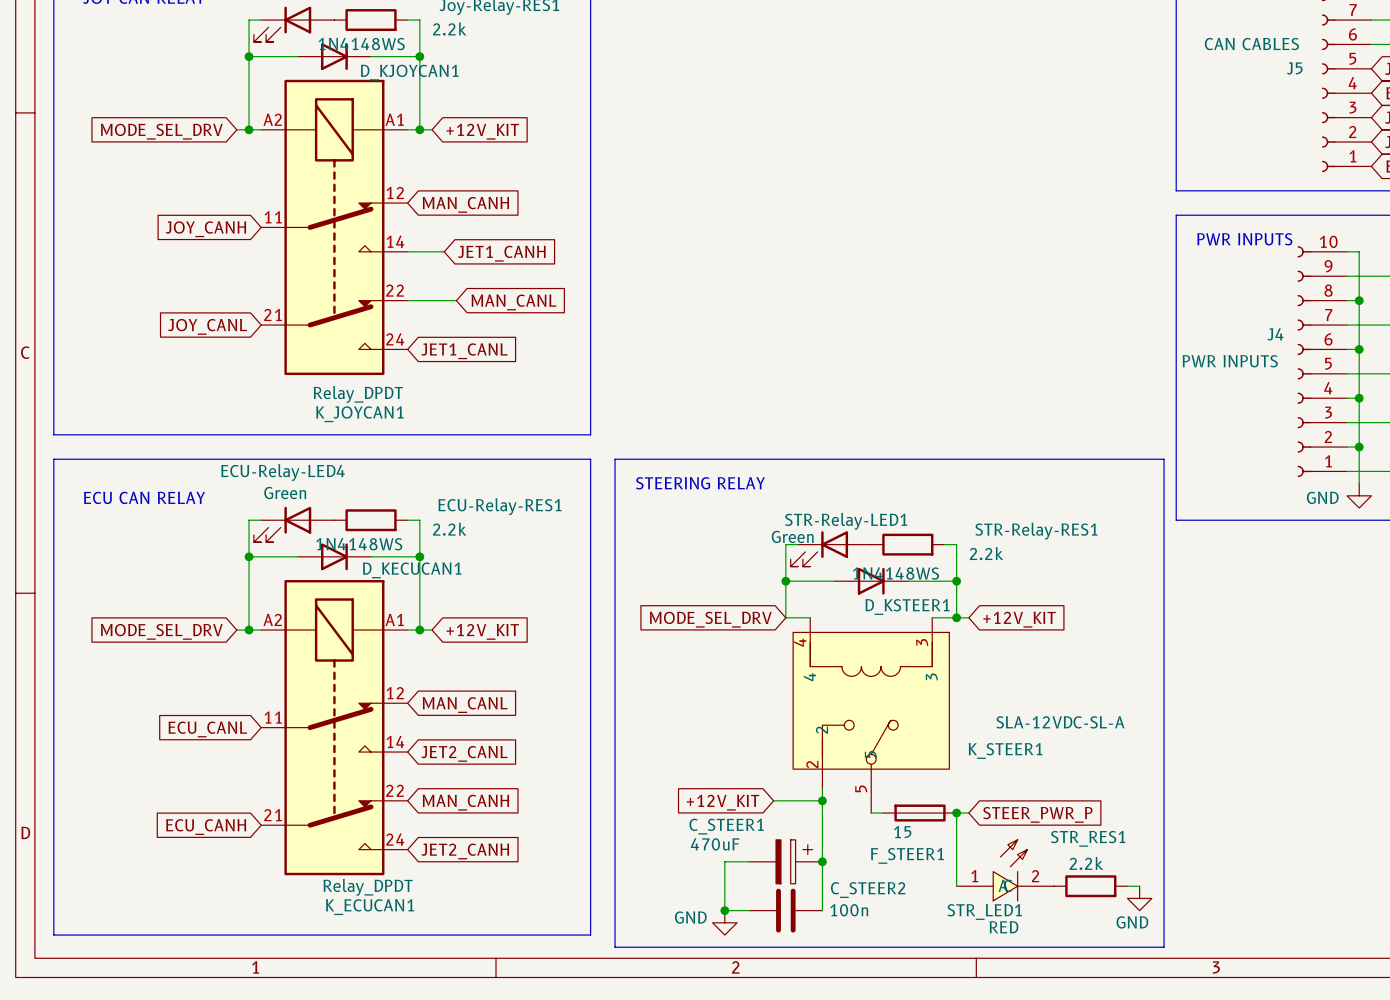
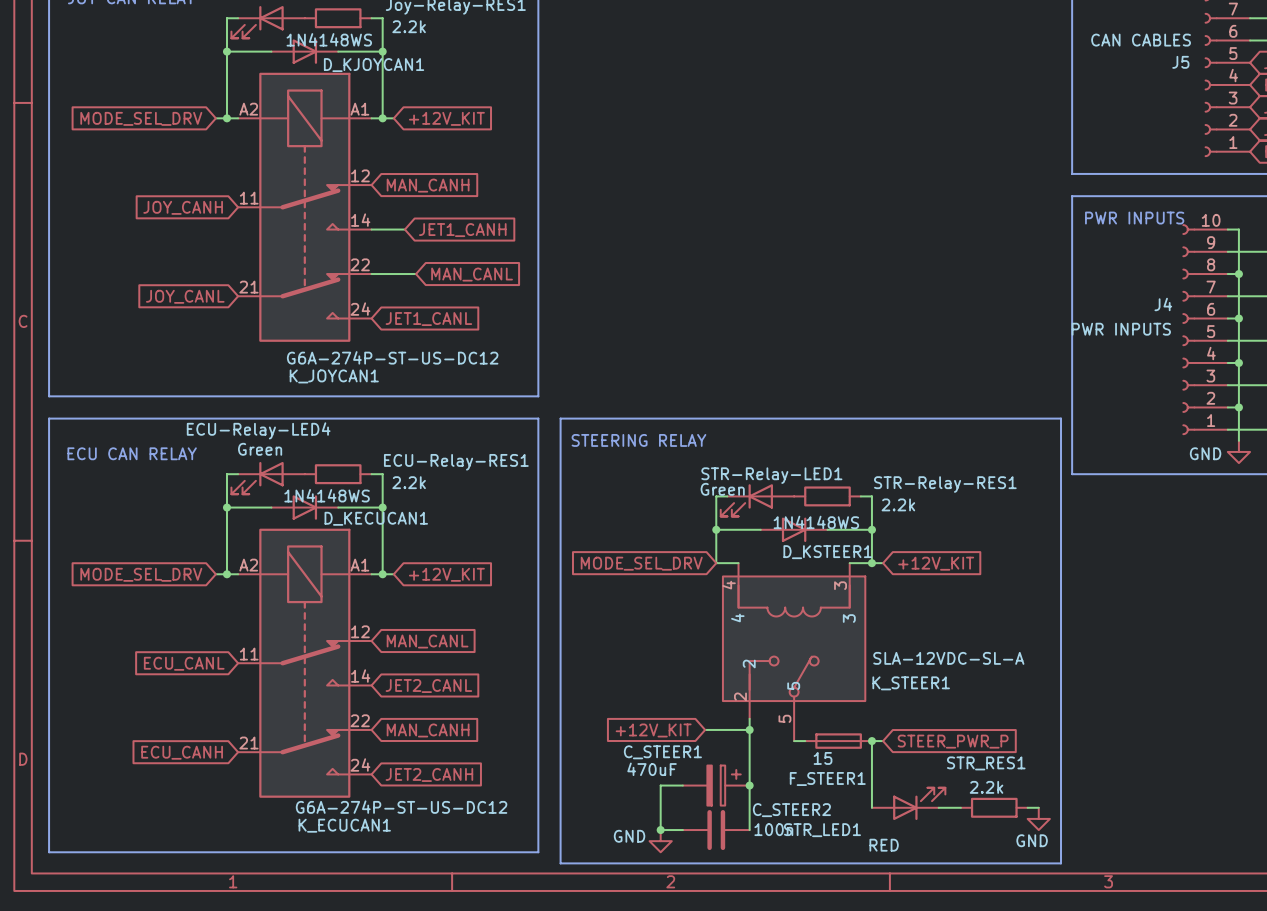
K_JOYCAN1 value: Relay_DPDT (358, 394) -> G6A-274P-ST-US-DC12 (392, 357)
STR_LED1 symbol: [956, 839, 1055, 901] -> [871, 787, 946, 821]
K_ECUCAN1 value: Relay_DPDT (368, 887) -> G6A-274P-ST-US-DC12 (401, 807)
STR_LED1 name position: STR_LED1 (984, 911) -> STR_LED1 (822, 830)
STR_LED1 value position: RED (1003, 927) -> RED (884, 845)

